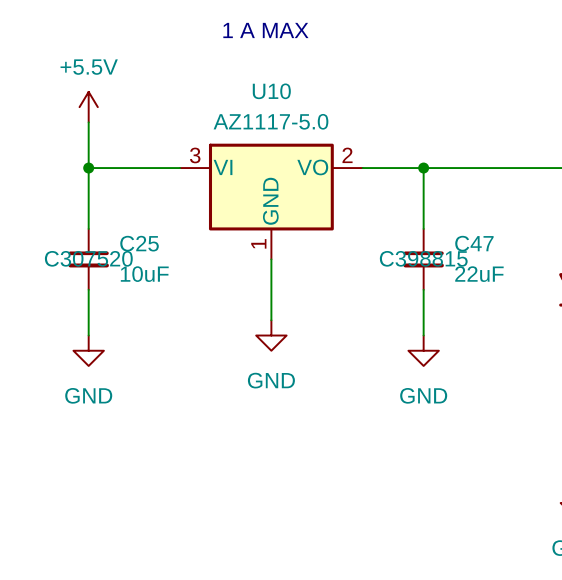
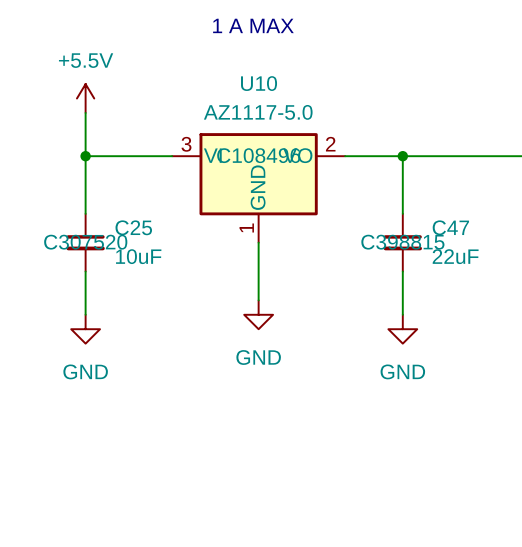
U10 text: none -> C108496 (258, 155)

